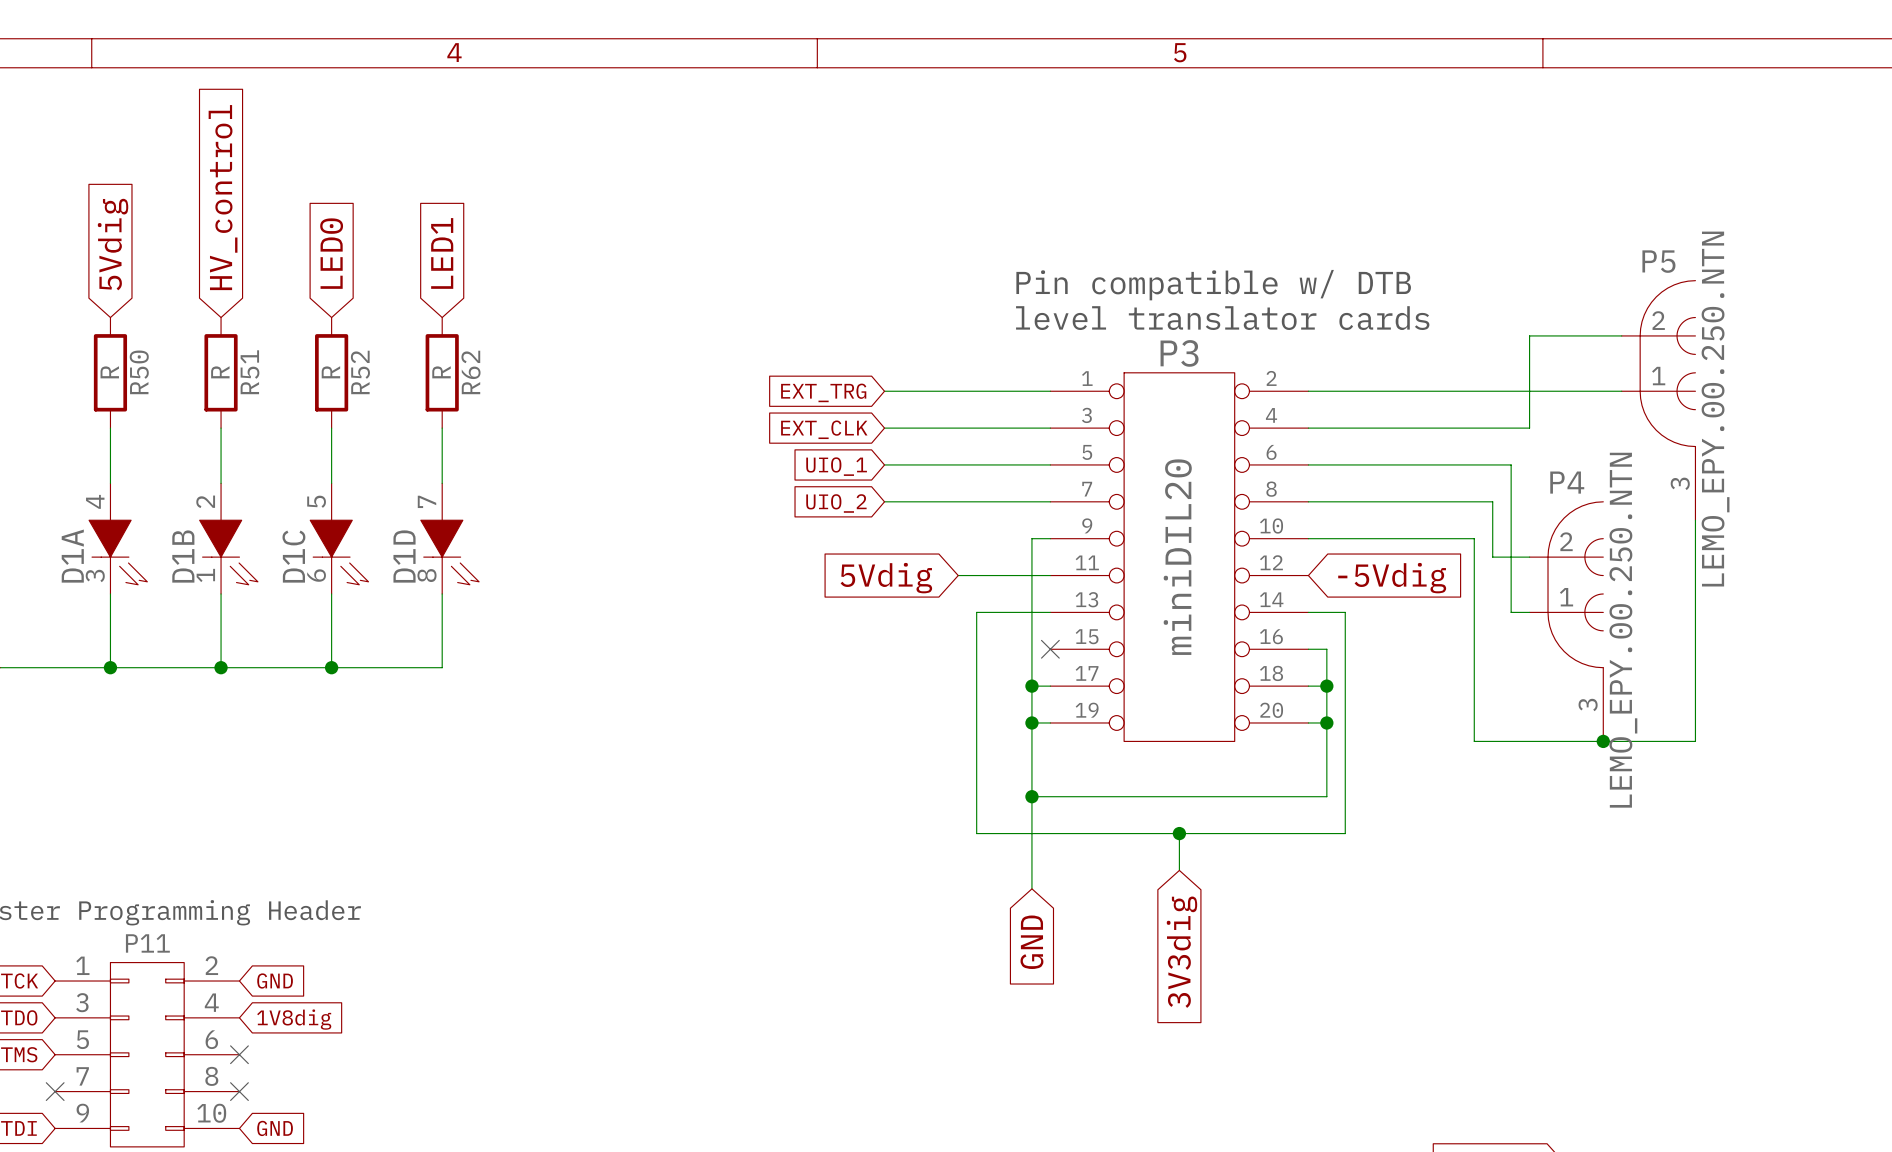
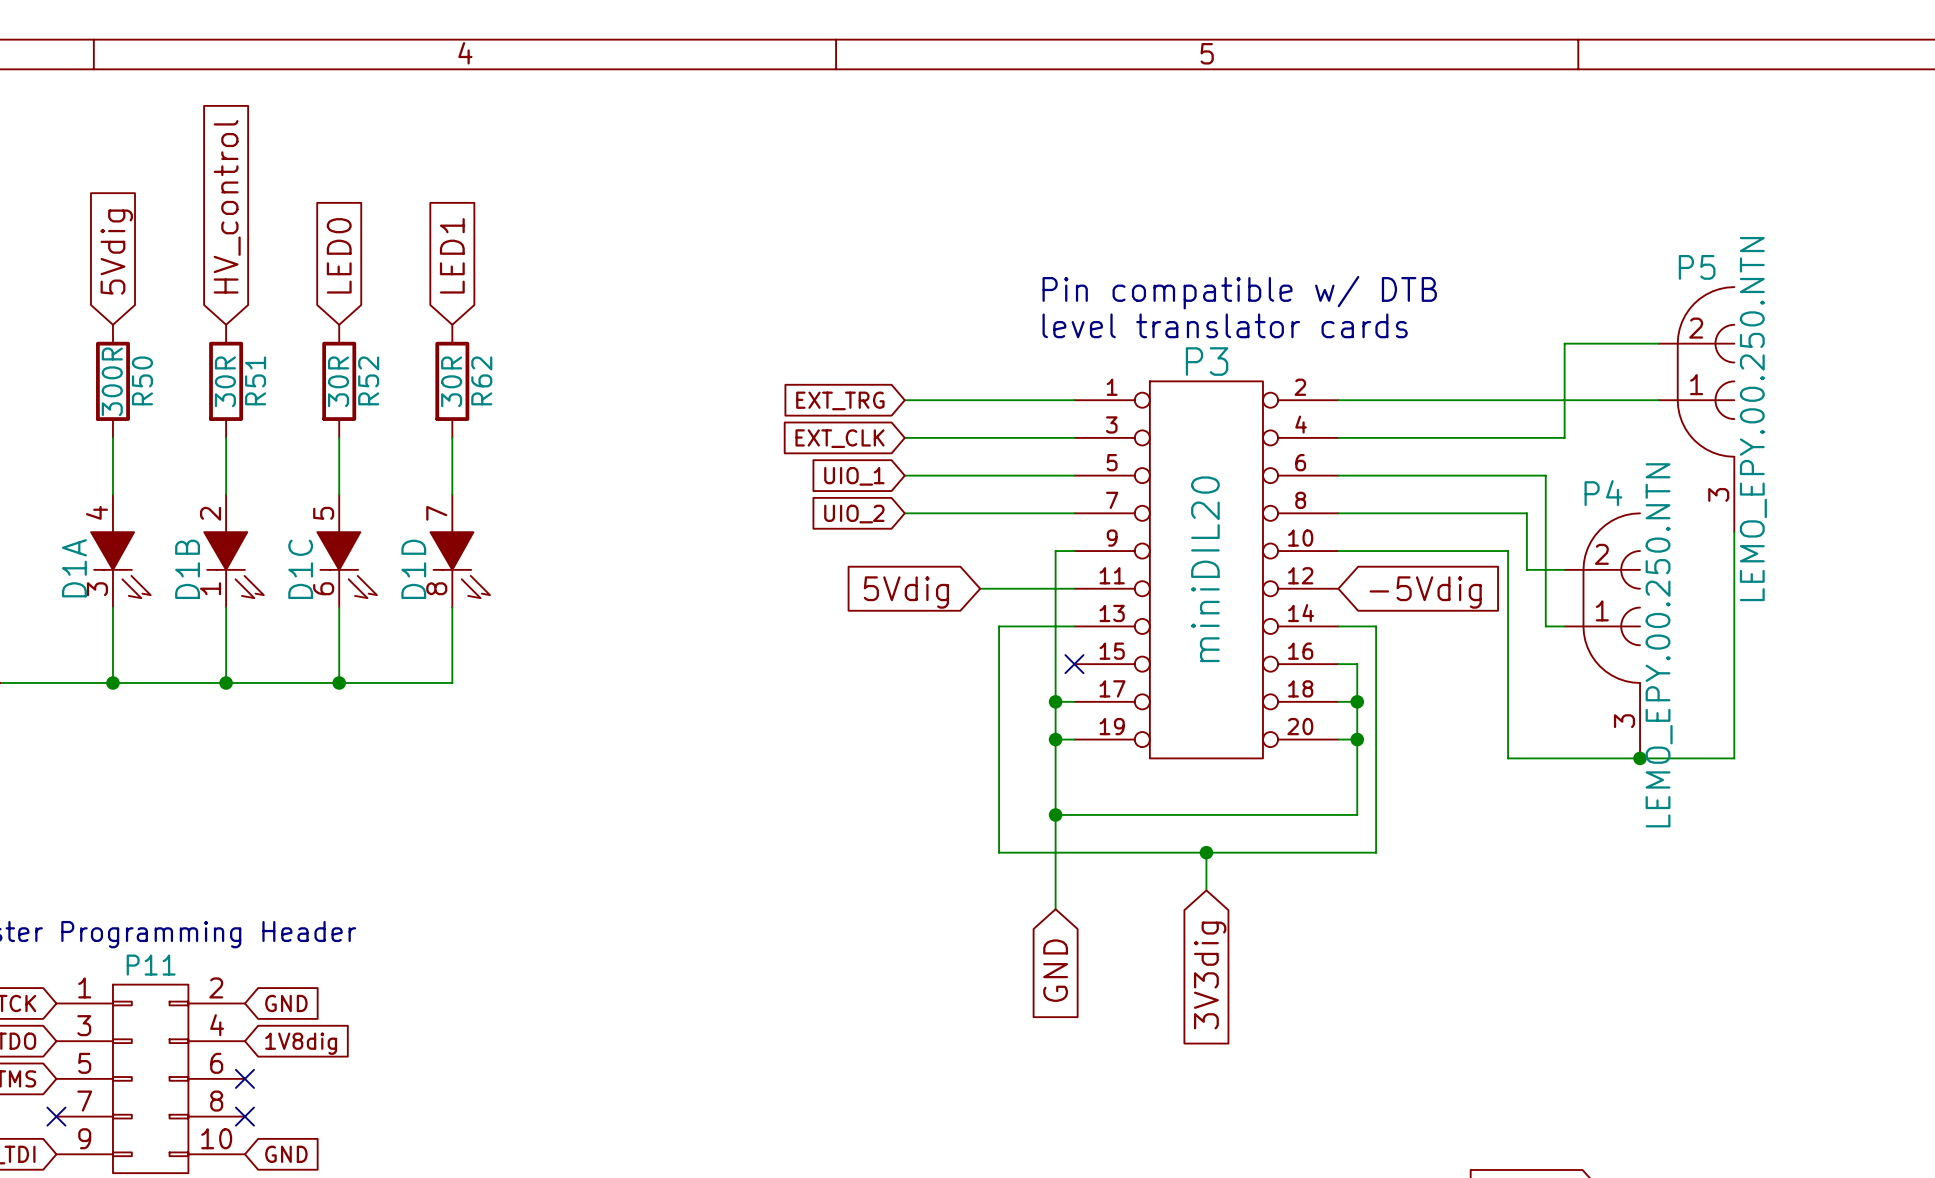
R50 value: R (109, 372) -> 300R (112, 381)
R51 value: R (220, 372) -> 30R (225, 381)
R52 value: R (330, 372) -> 30R (338, 381)
R62 value: R (441, 372) -> 30R (451, 381)

